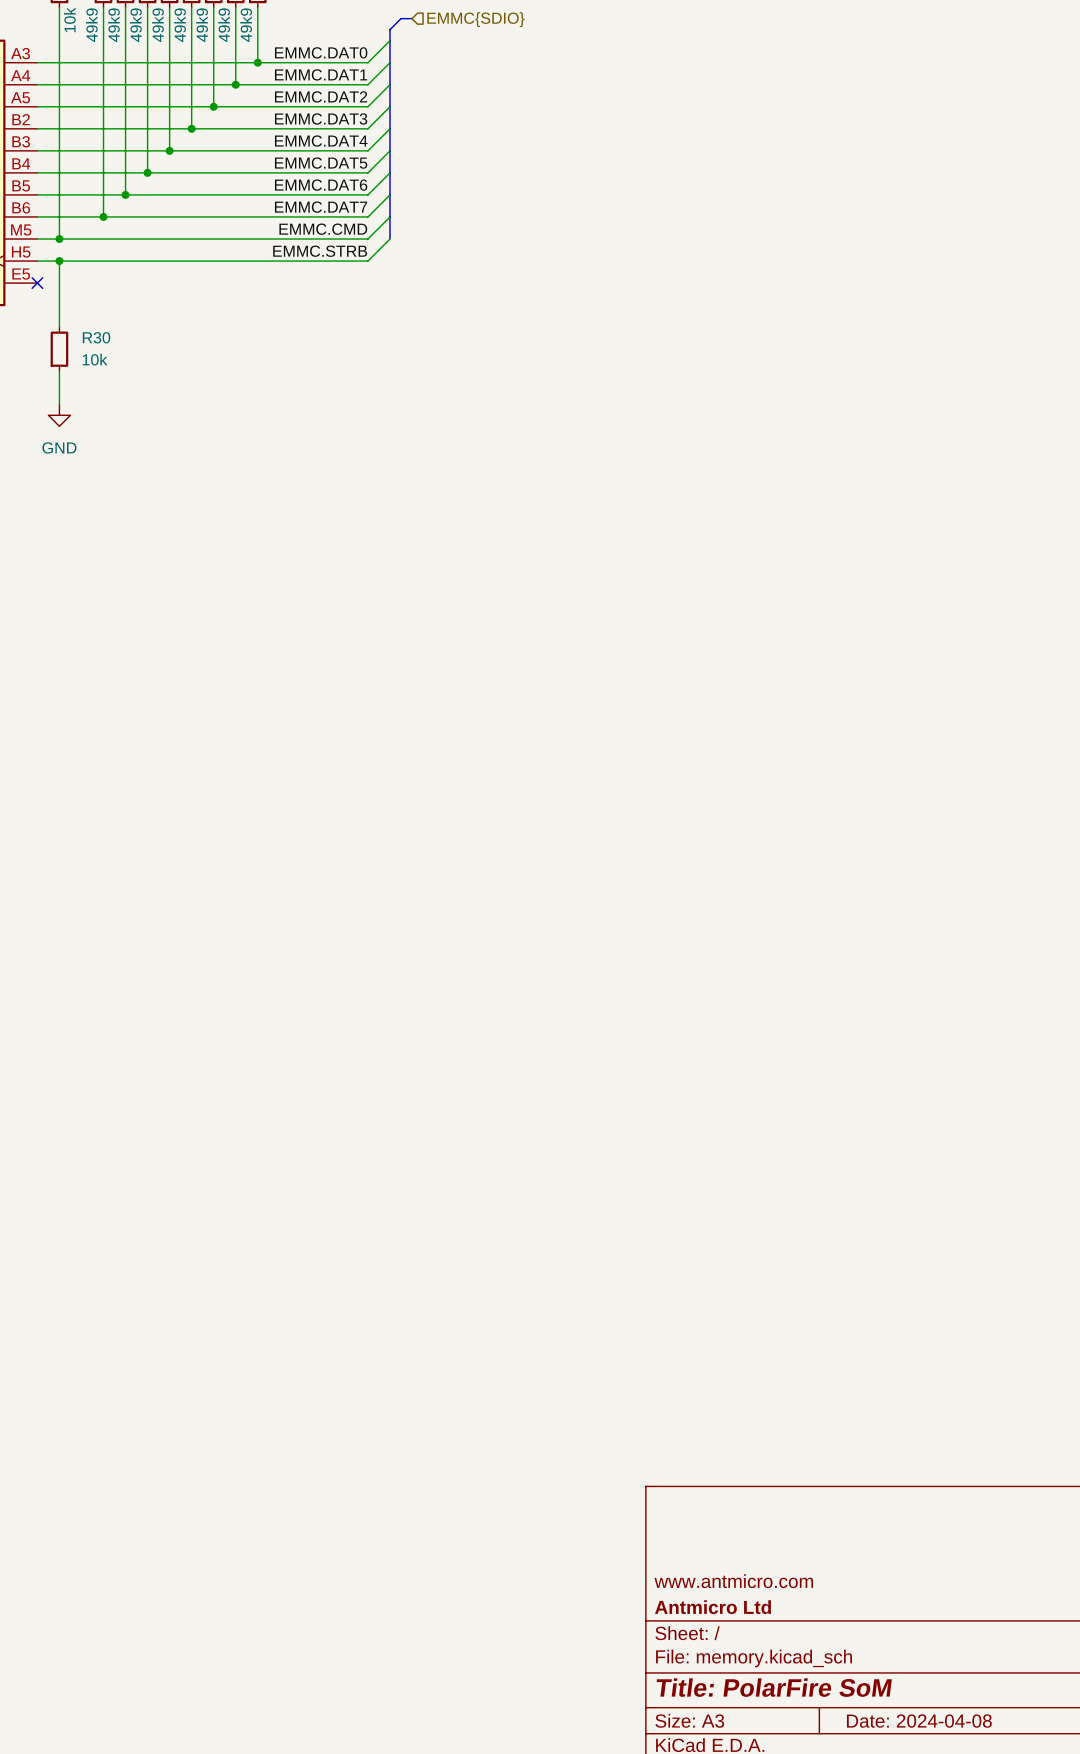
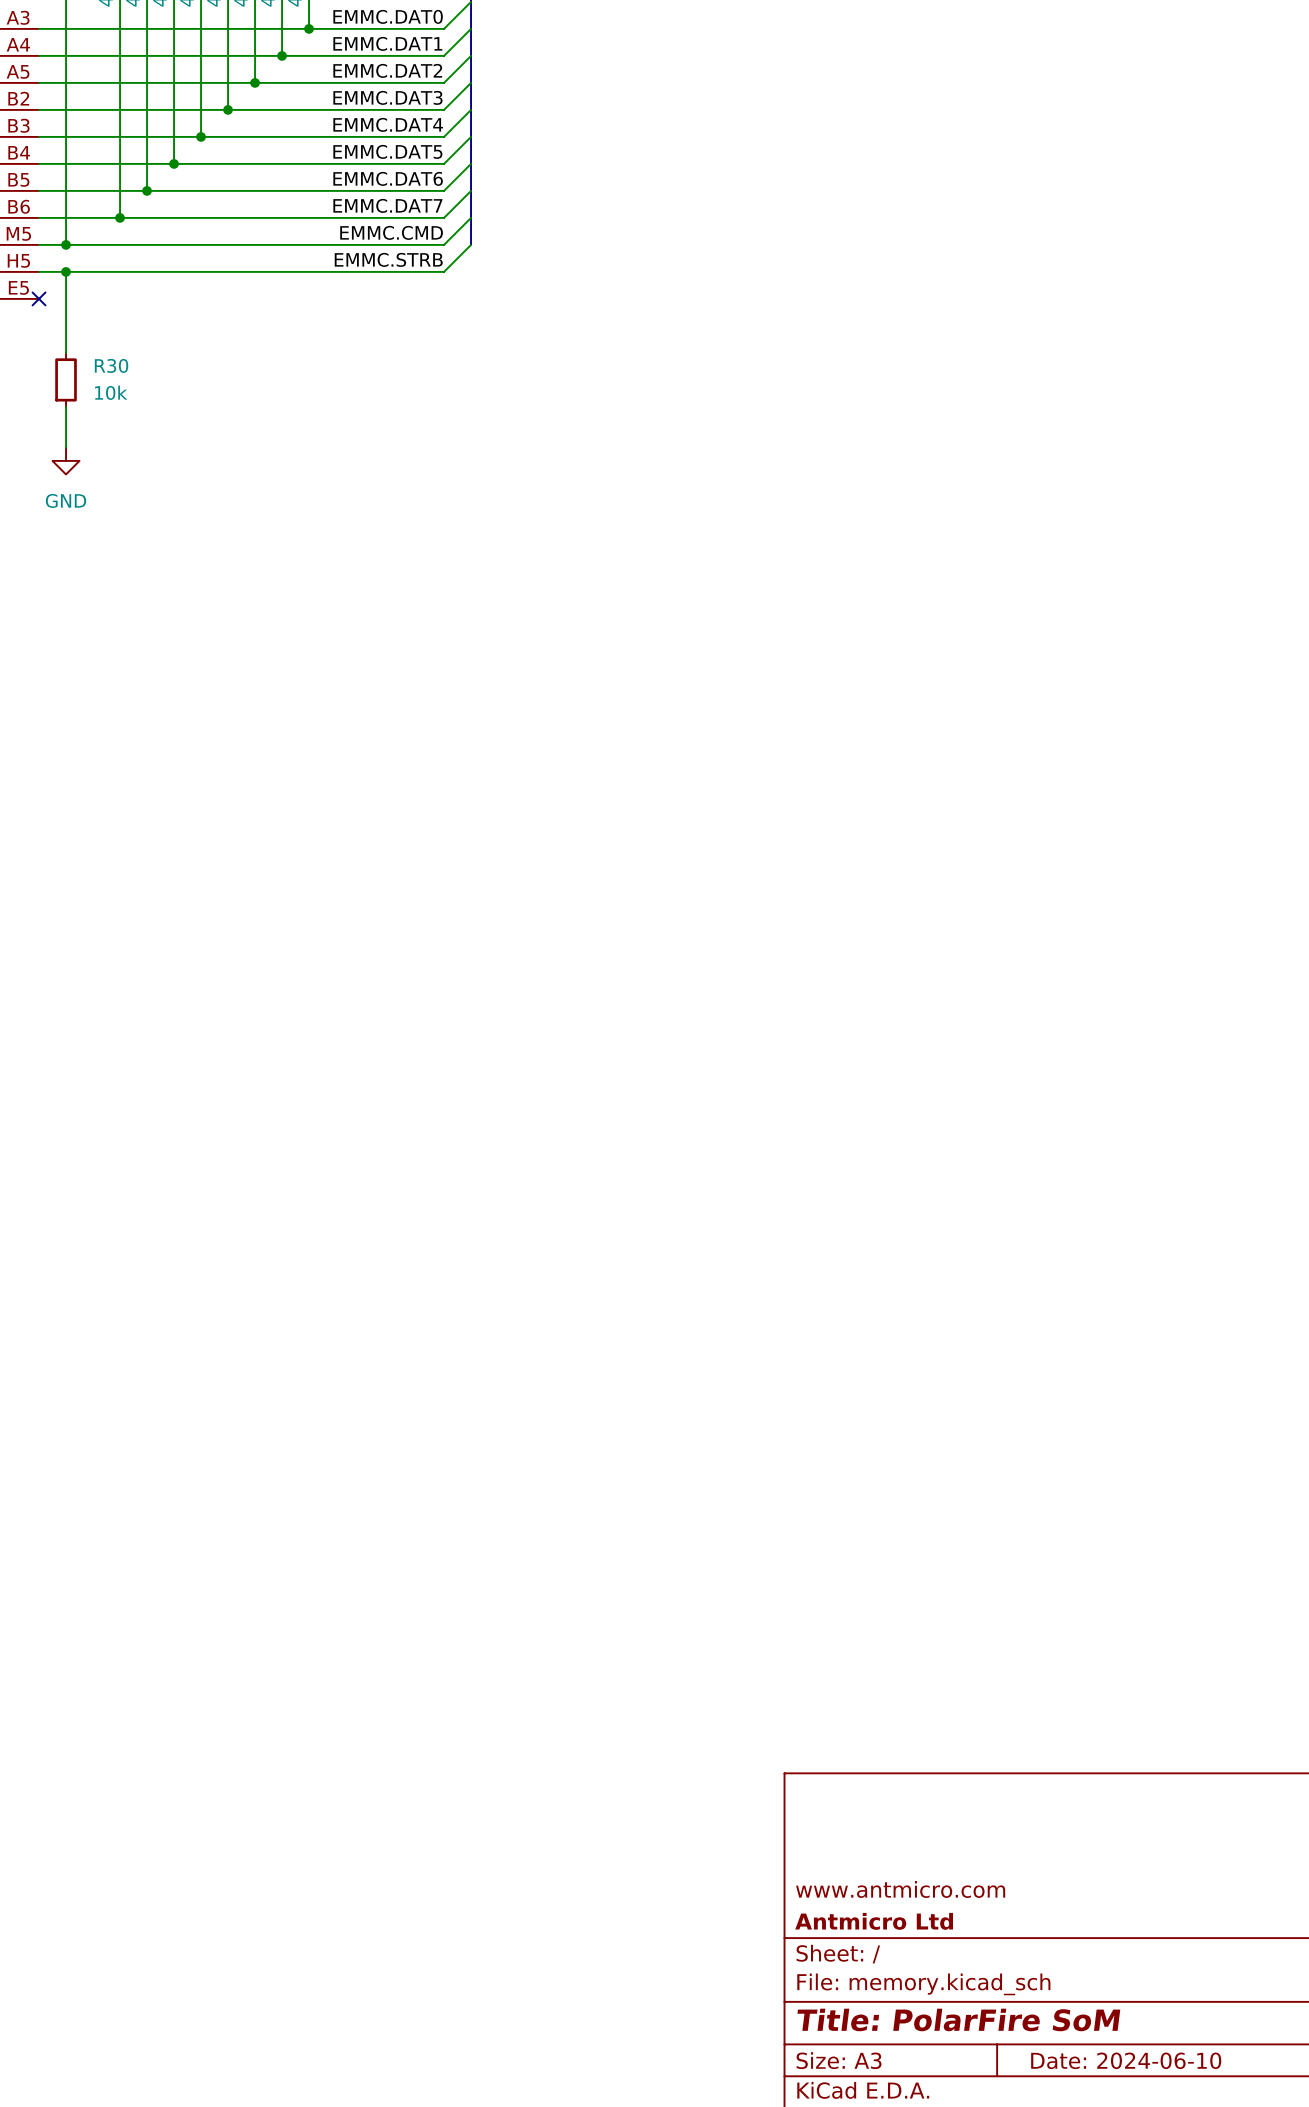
title block: Date: 2024-04-08 (919, 1721) -> Date: 2024-06-10 (1126, 2060)

